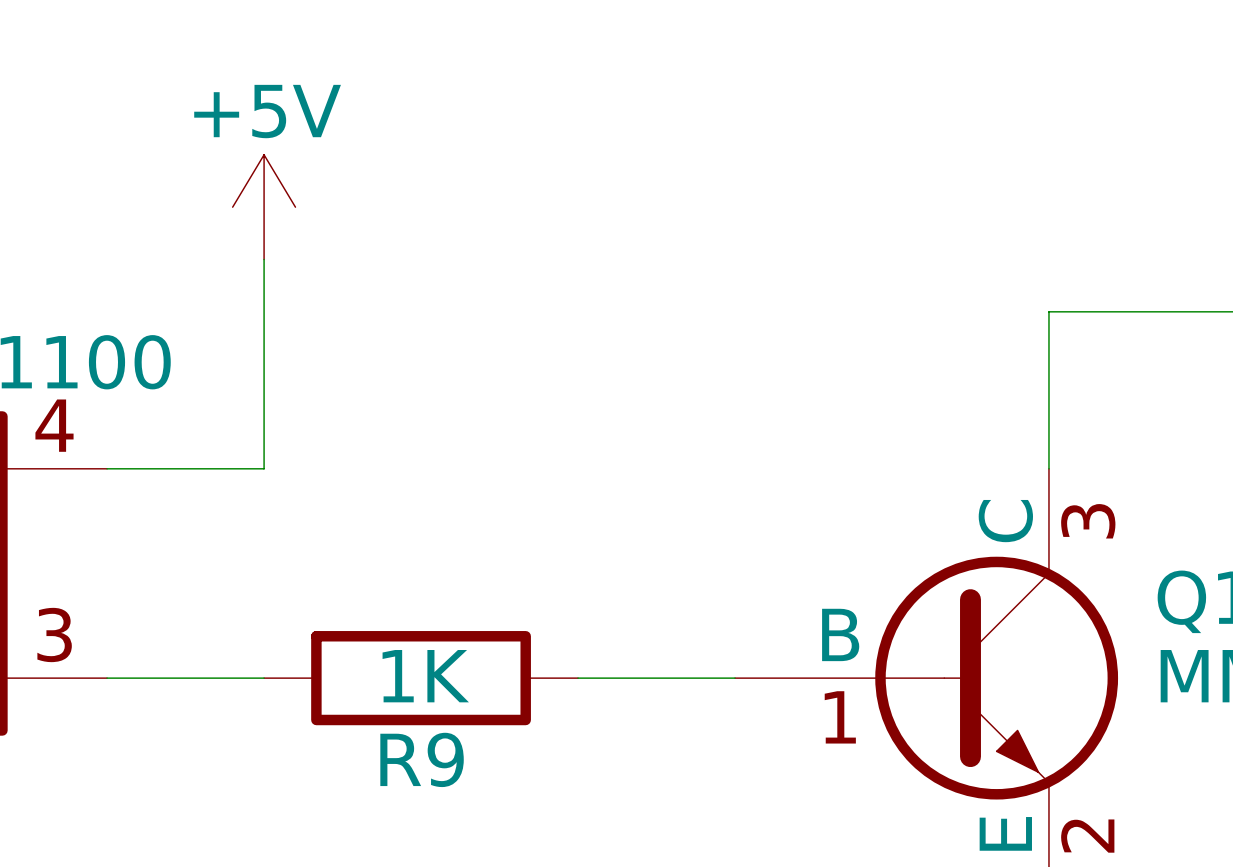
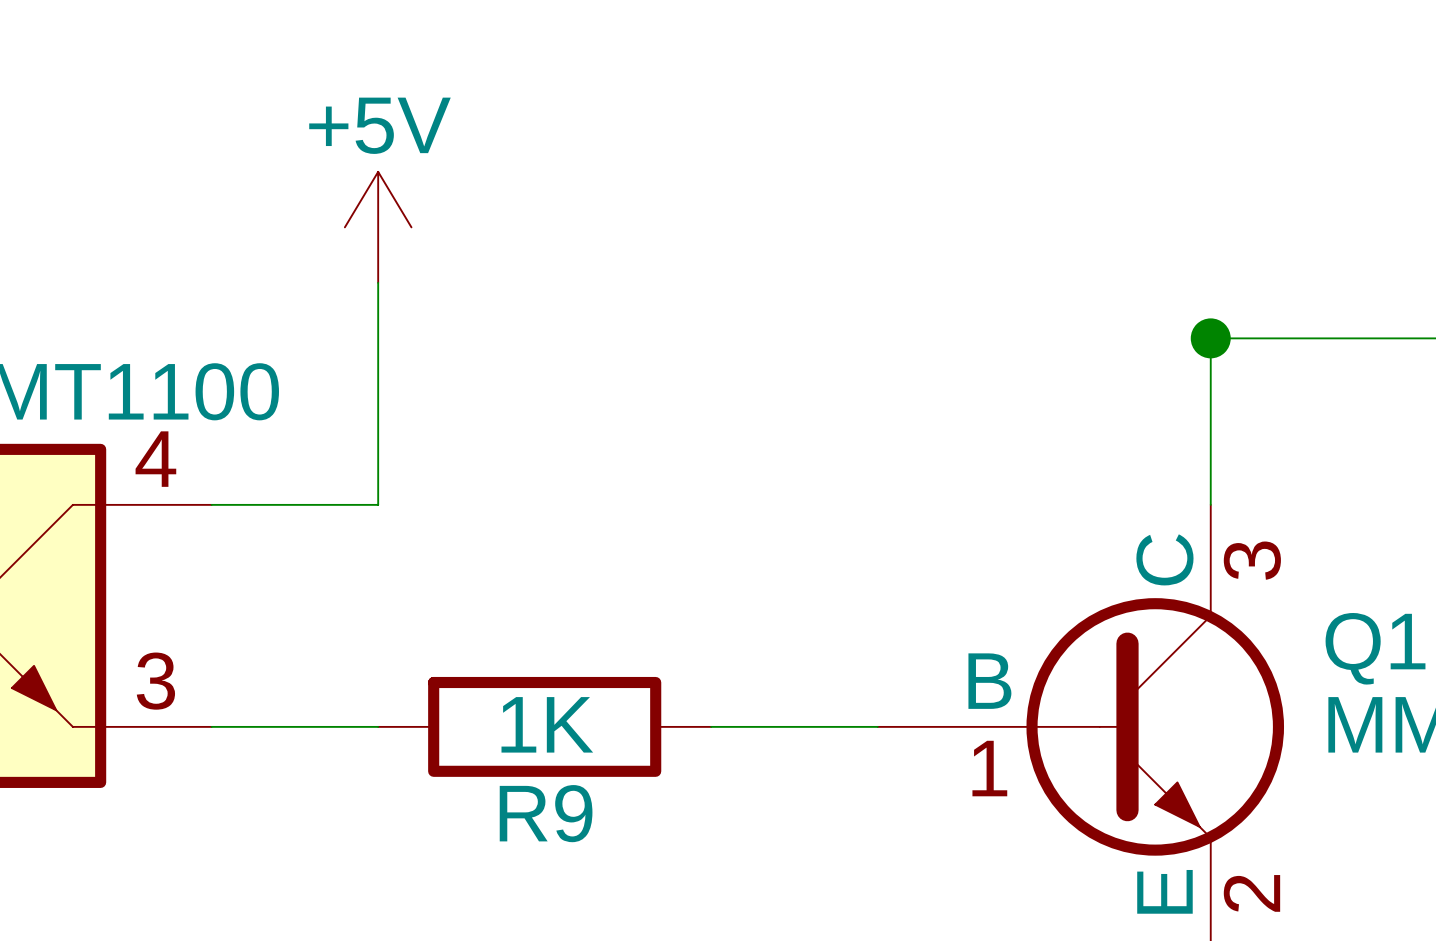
junction: none -> (1210, 338)

